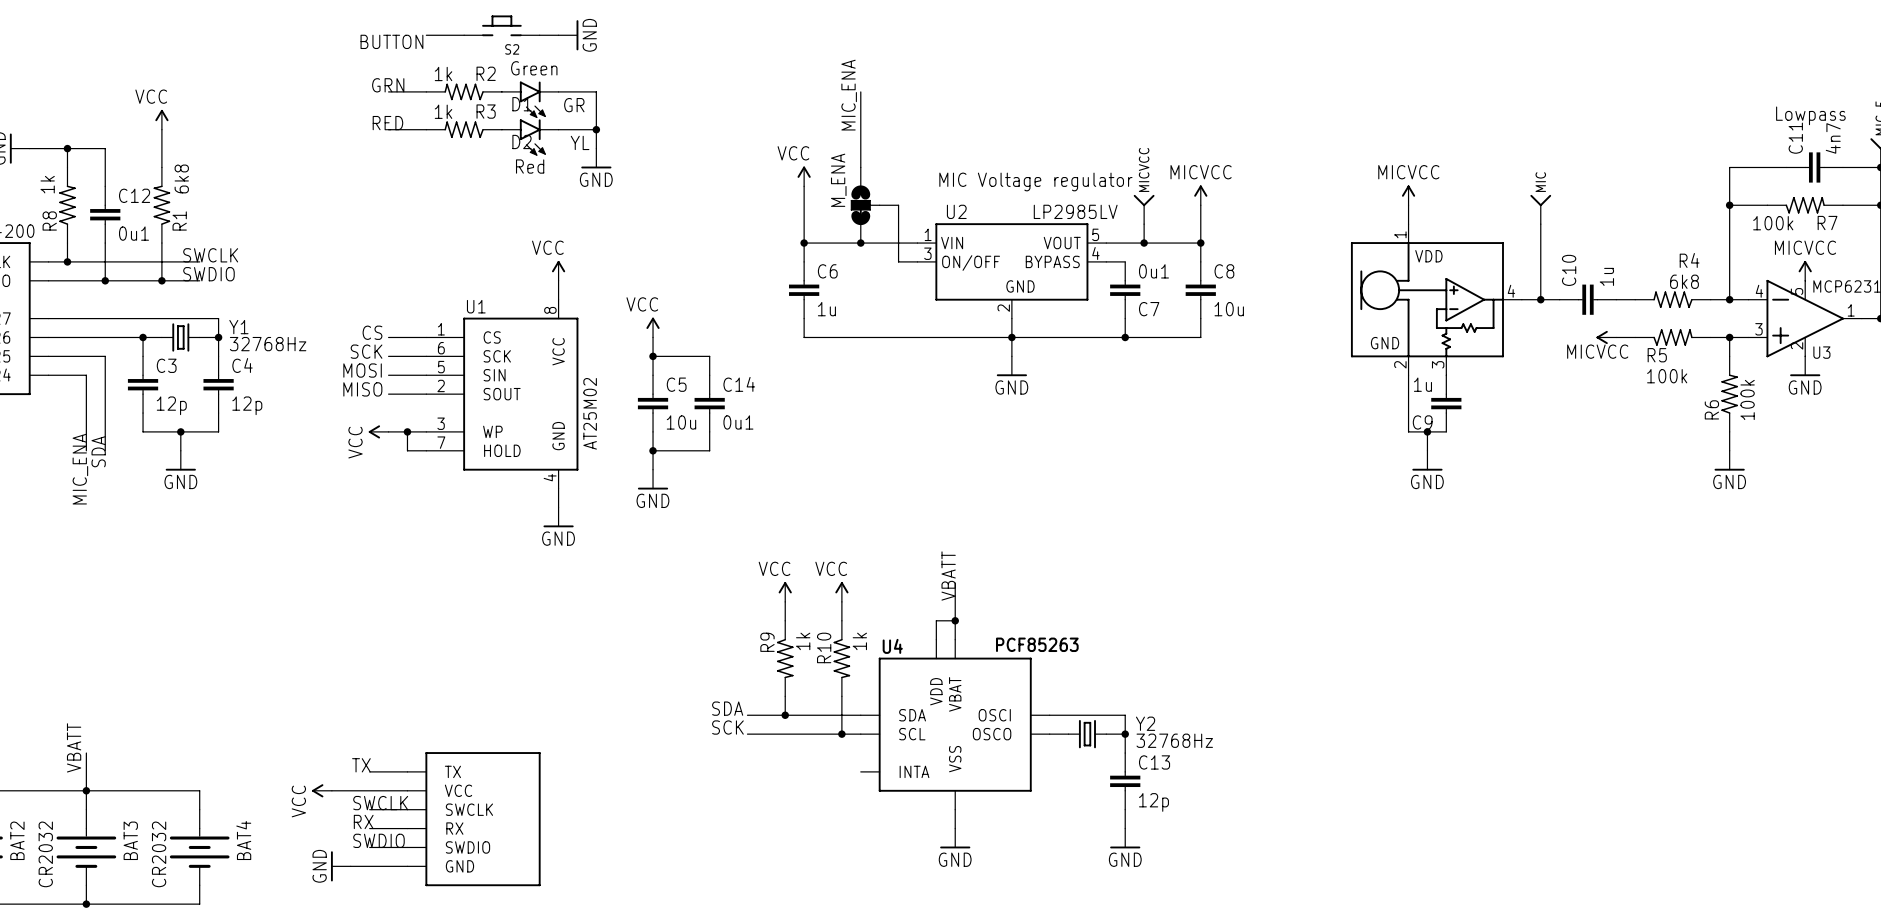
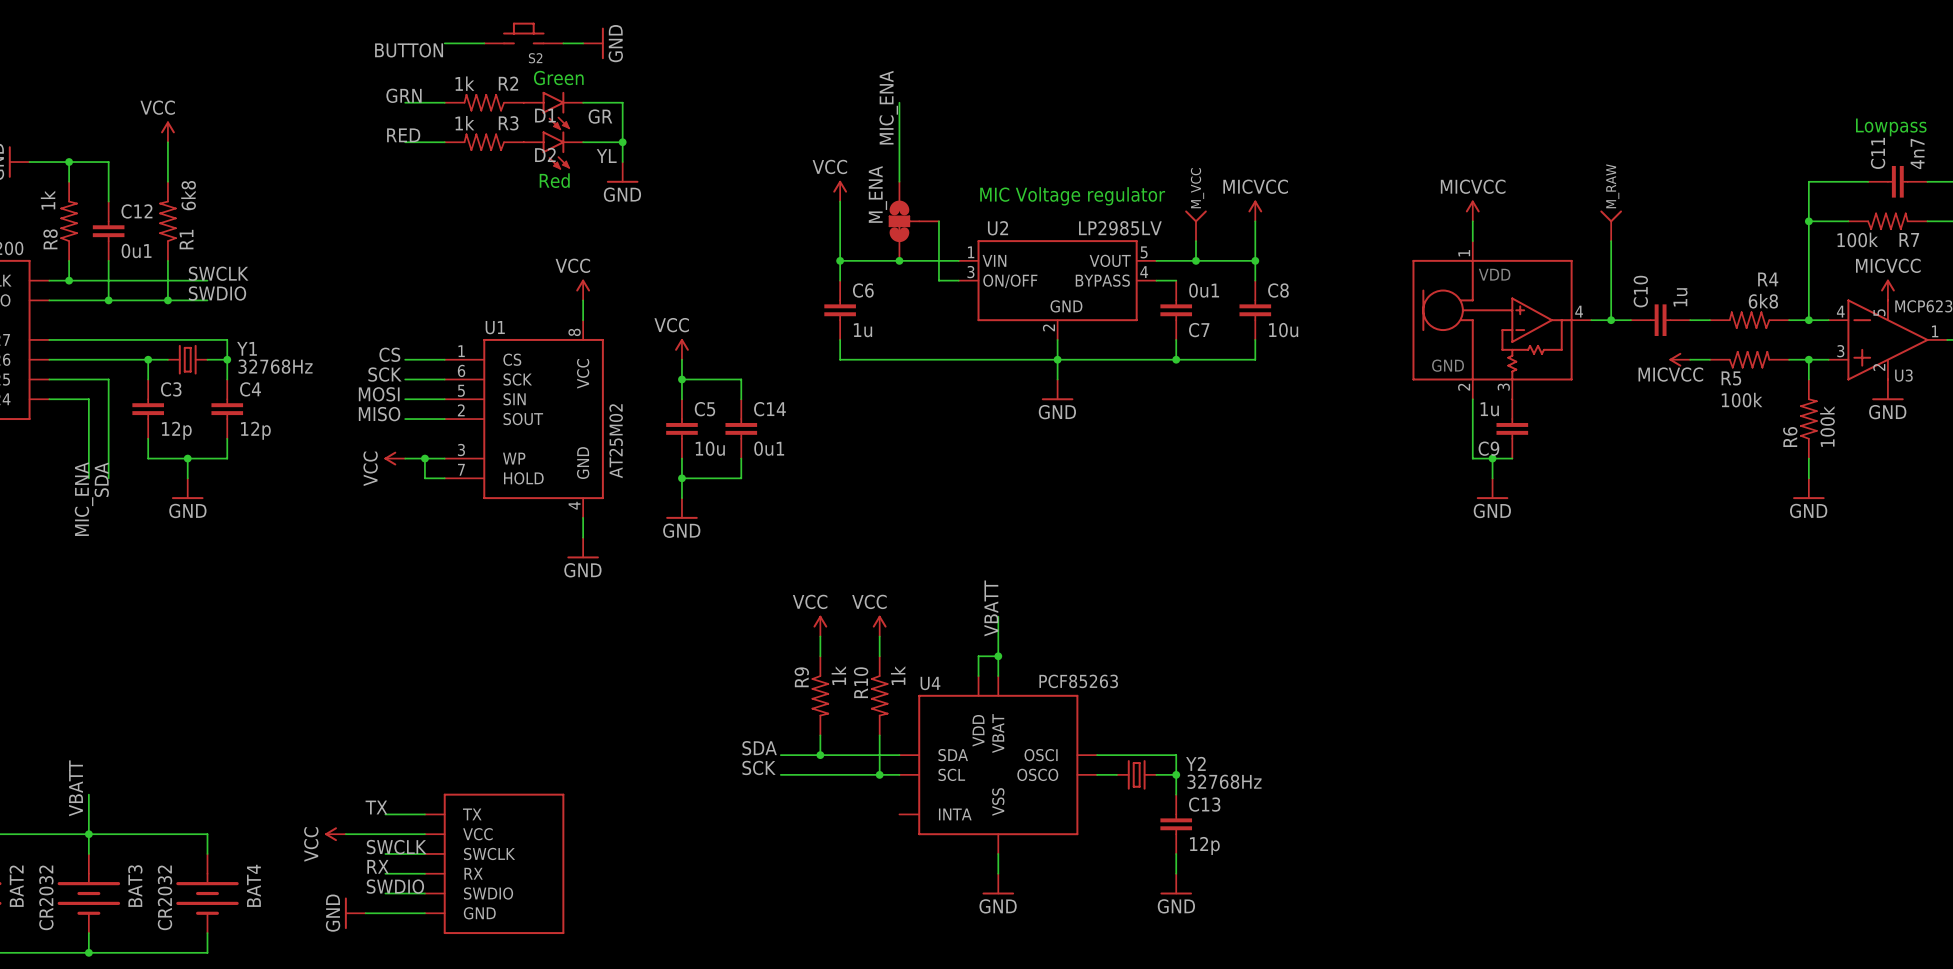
MICVCC name: MICVCC (1144, 169) -> M_VCC (1197, 188)
MIC name: MIC (1540, 182) -> M_RAW (1612, 186)

